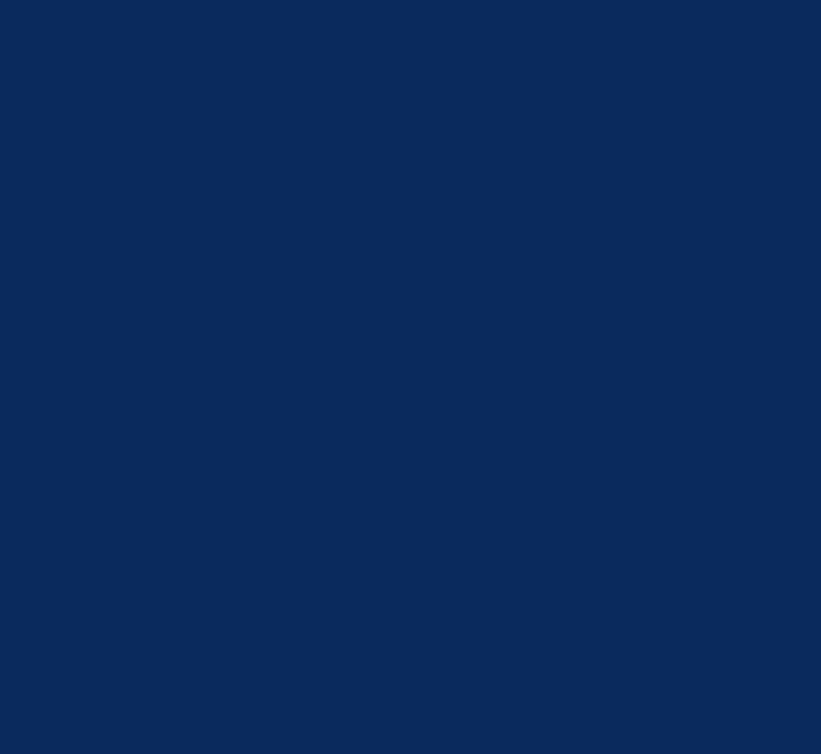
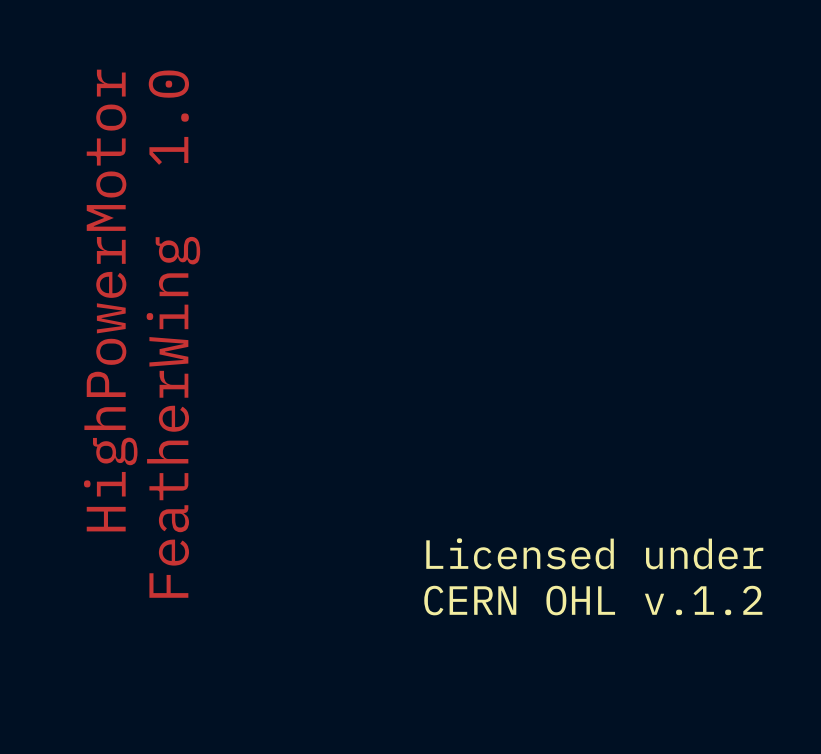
text: none -> HighPowerMotor (110, 300)
text: none -> FeatherWing 1.0 (173, 334)
text: none -> Licensed under (594, 553)
text: none -> CERN OHL v.1.2 (593, 600)

